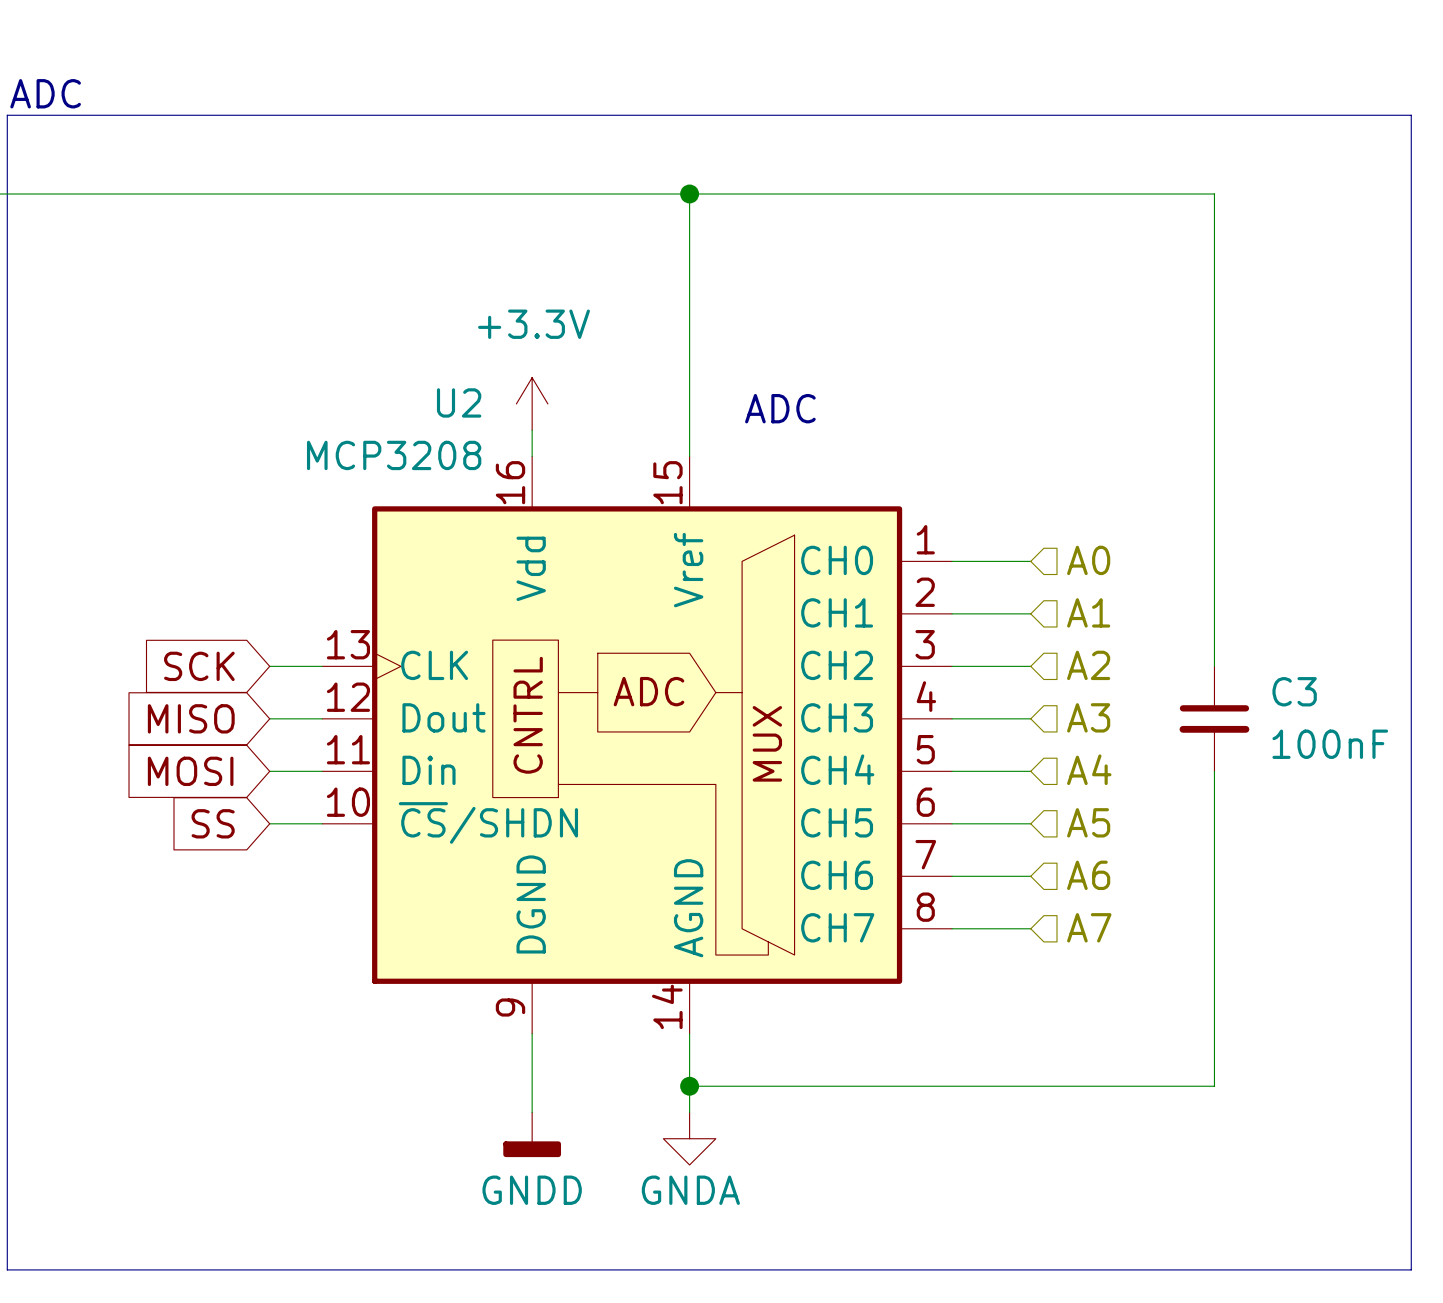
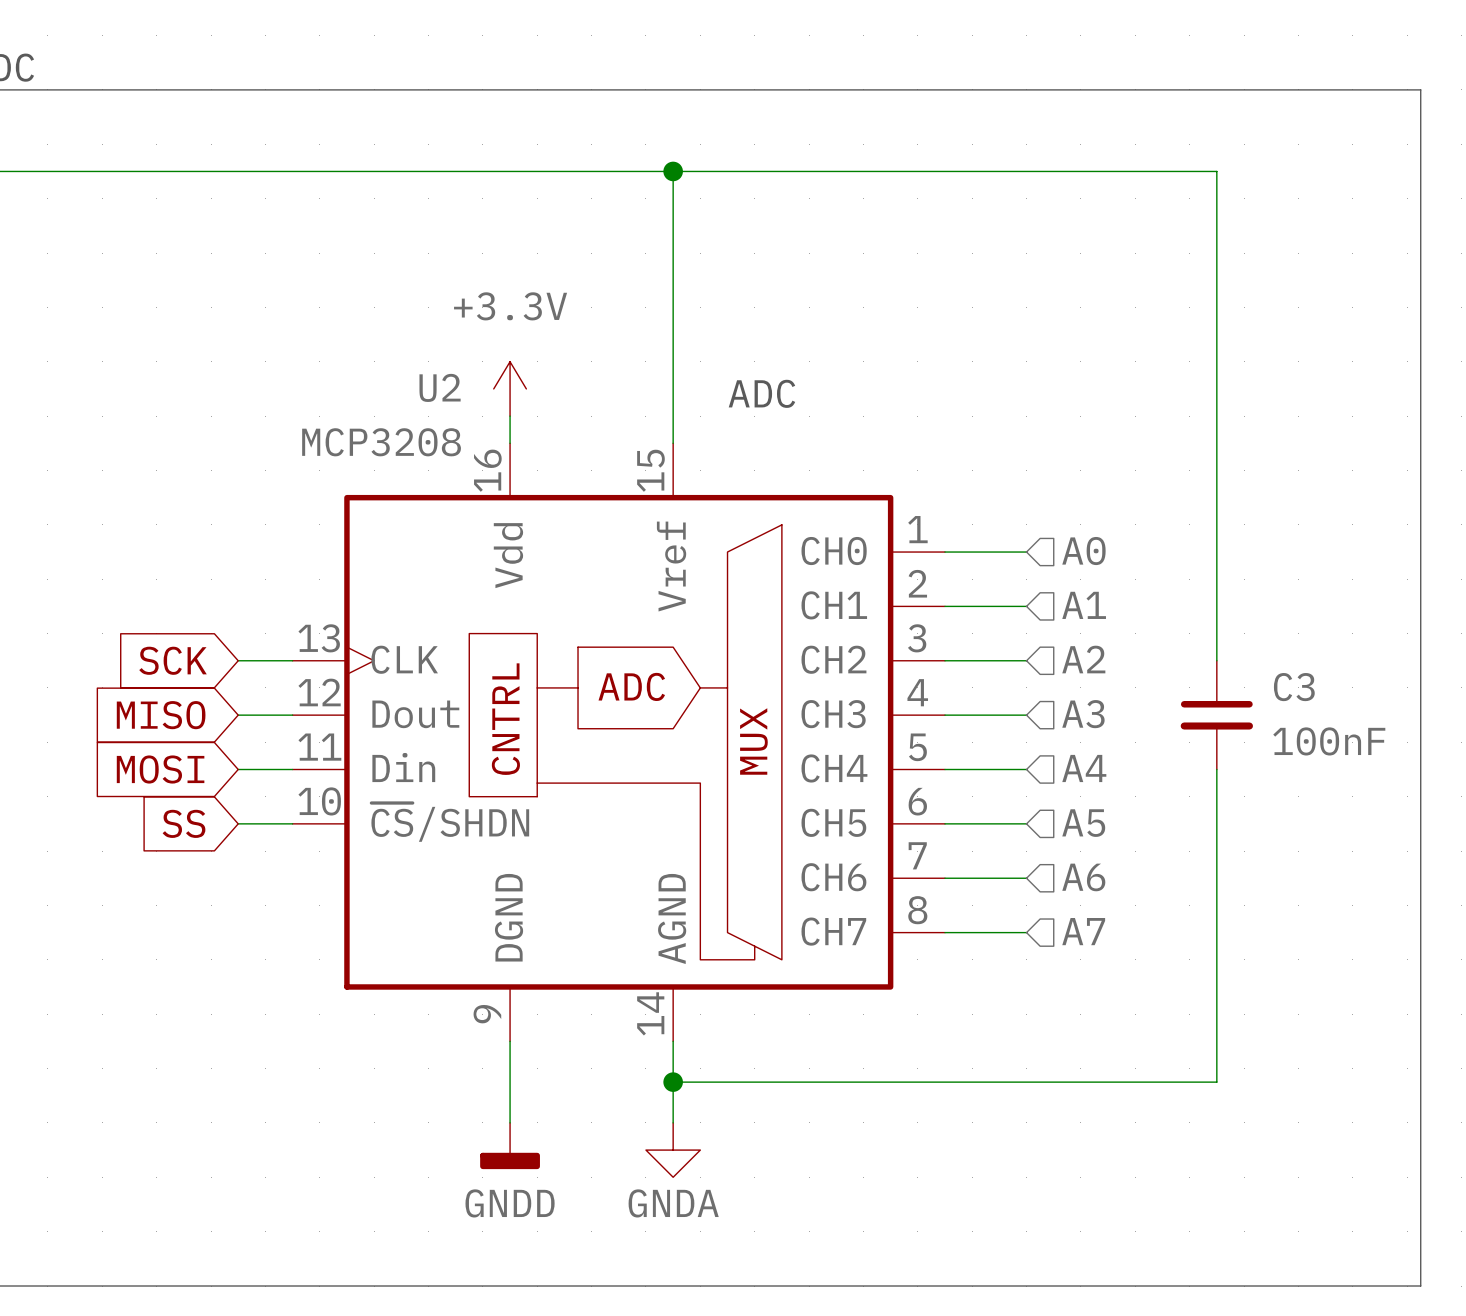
wire: (1214, 1073) (1214, 1086) (689, 1086) -> (1216, 1082) (673, 1082)
junction position: (689, 1086) -> (673, 1082)

